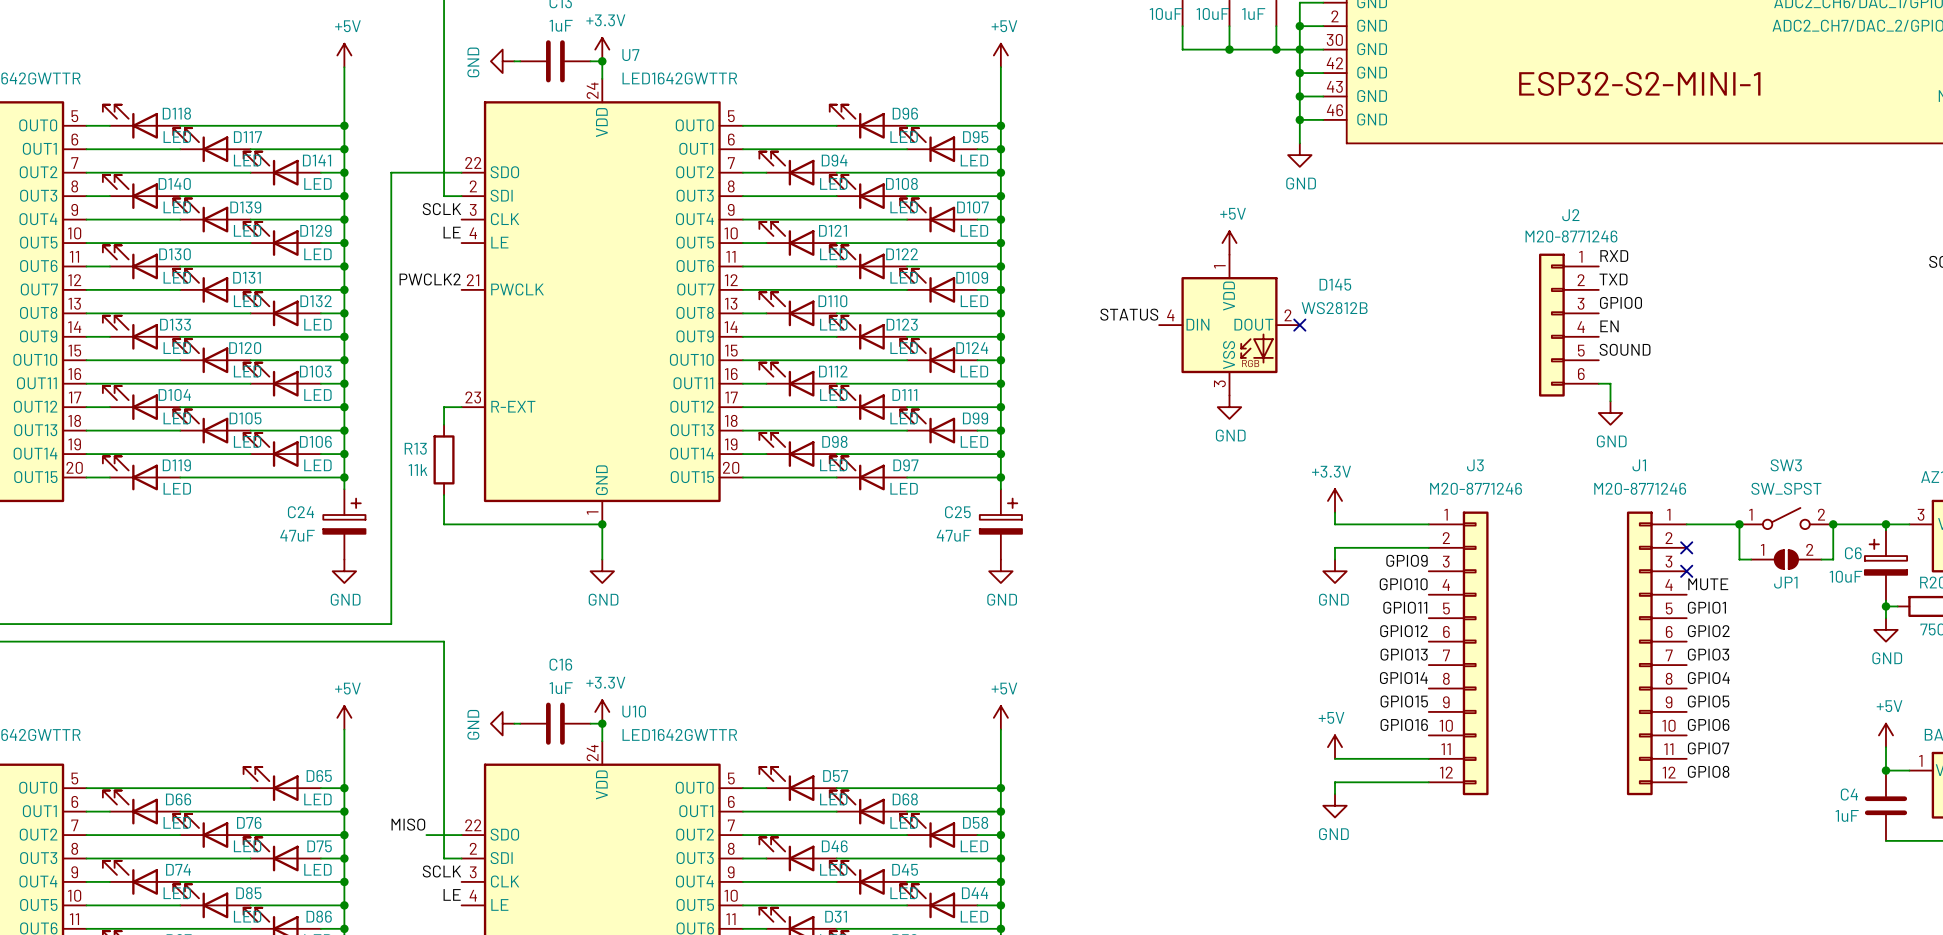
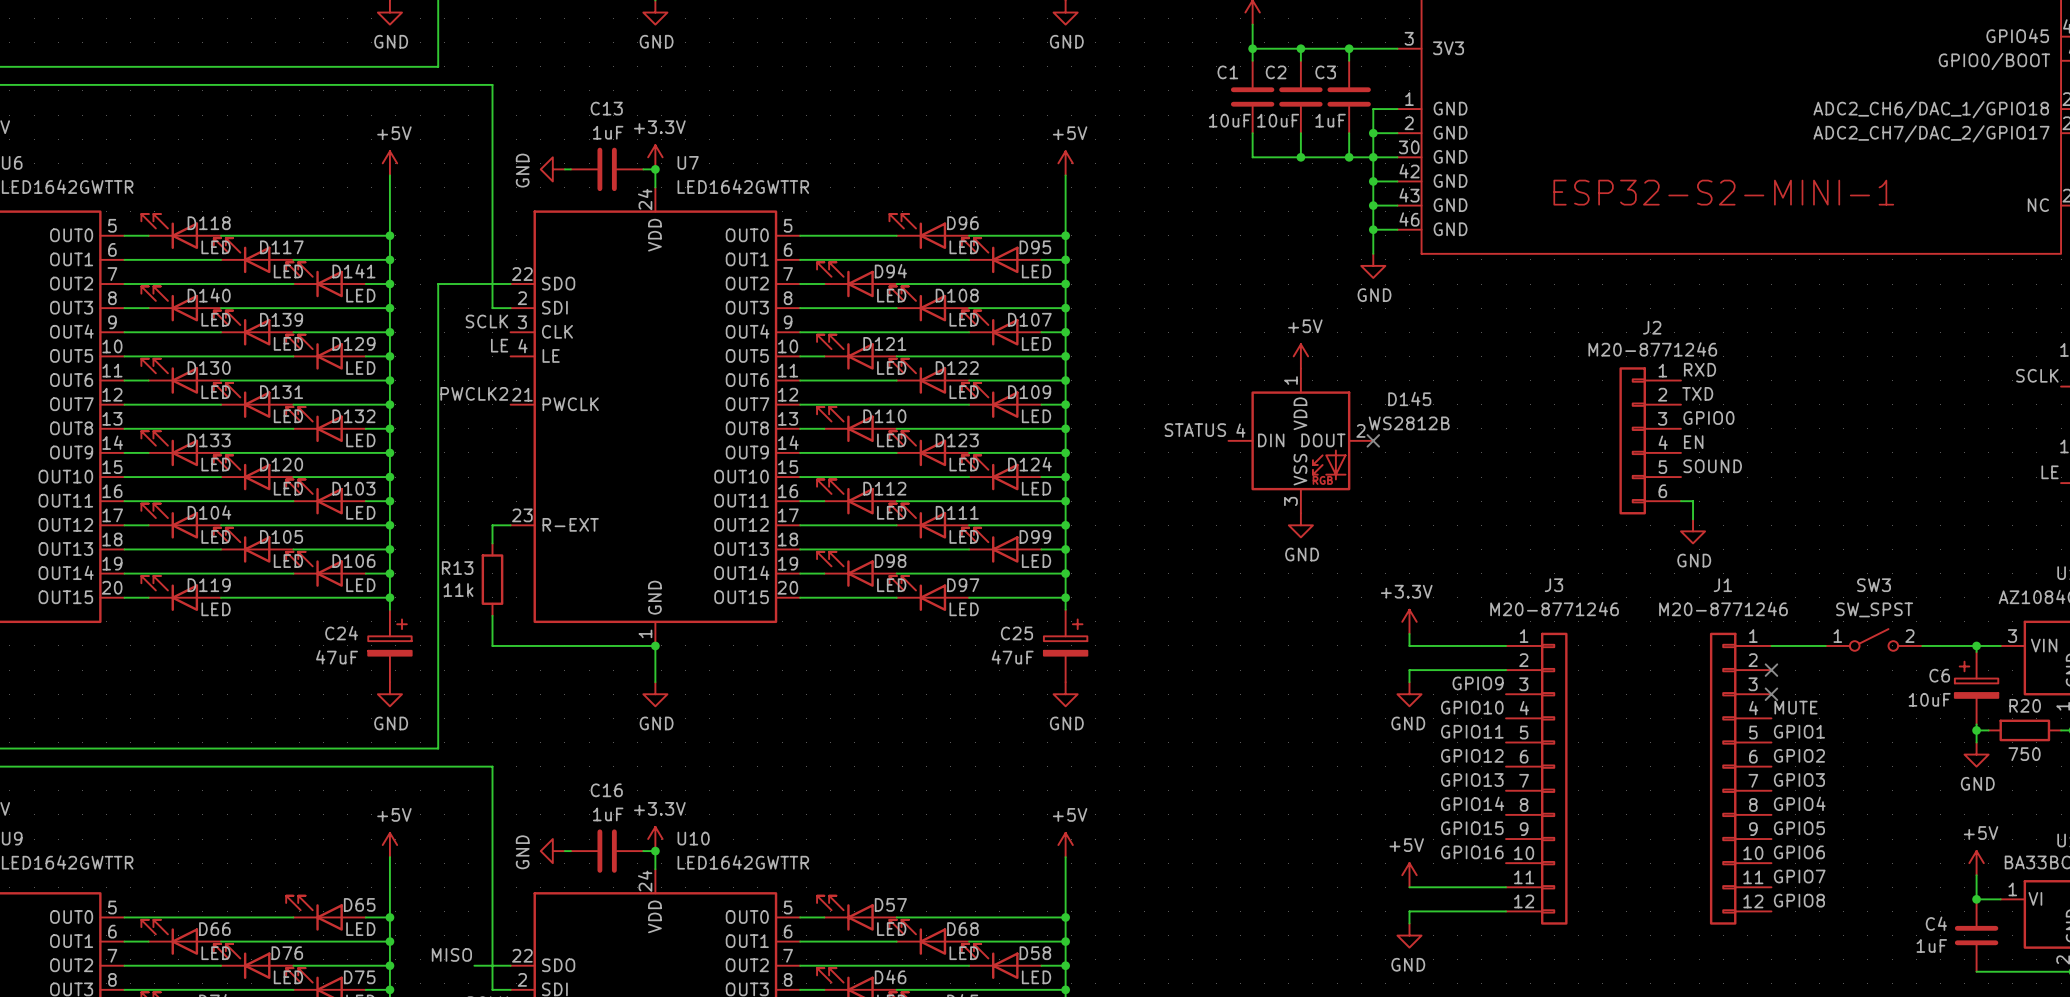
wire: (1739, 524) (1739, 559) (1751, 559) -> none
junction: (1739, 524) -> none
wire: (1833, 524) (1833, 559) (1821, 559) -> none
junction: (1833, 524) -> none
JP1: (1786, 559) -> none

